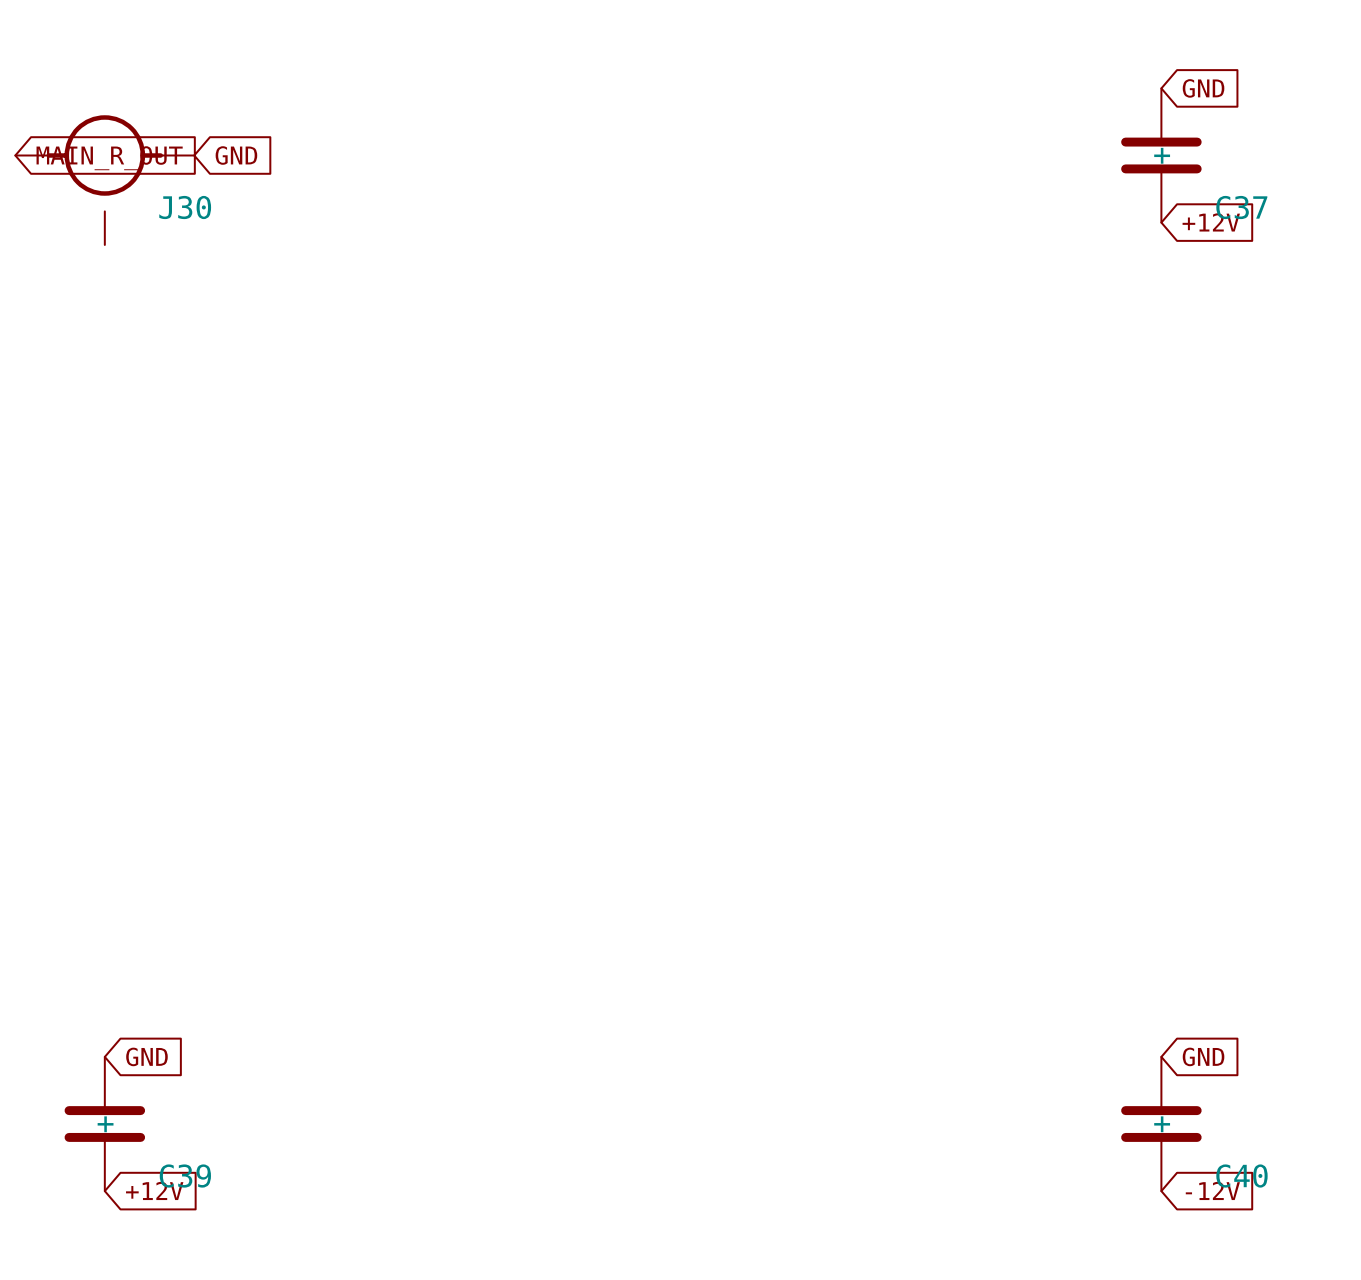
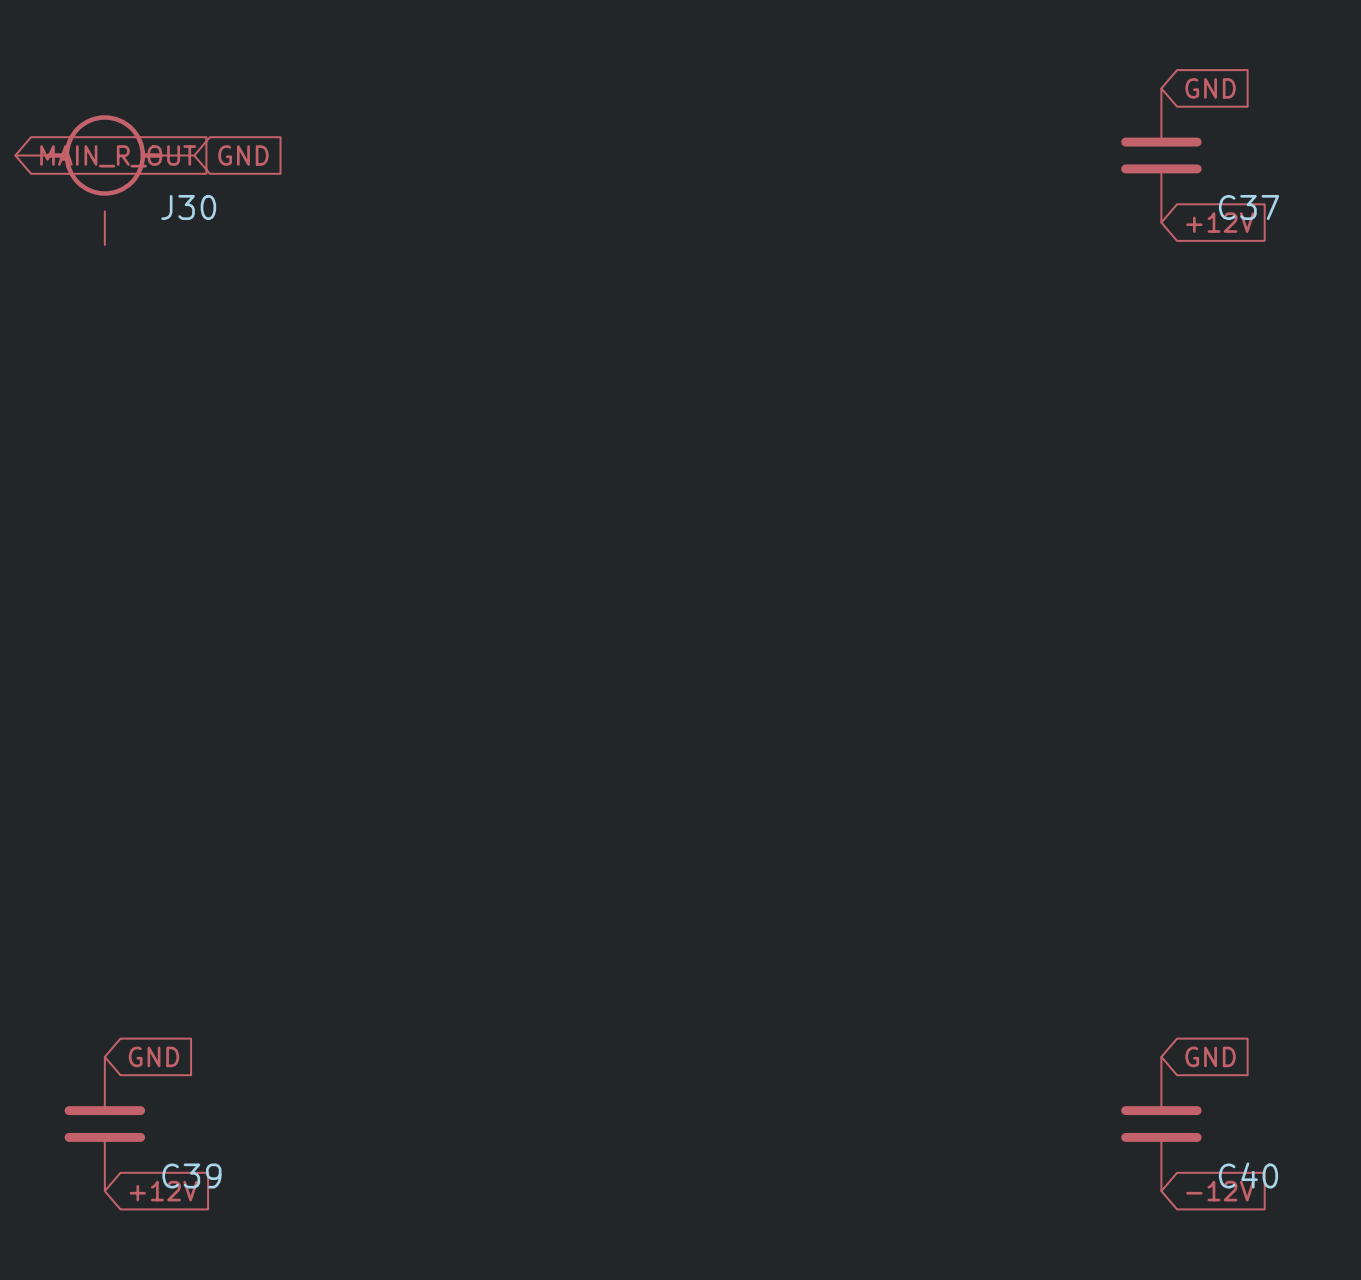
C37 pin name: + (1162, 155) -> none
C39 pin name: + (105, 1124) -> none
C40 pin name: + (1162, 1124) -> none

